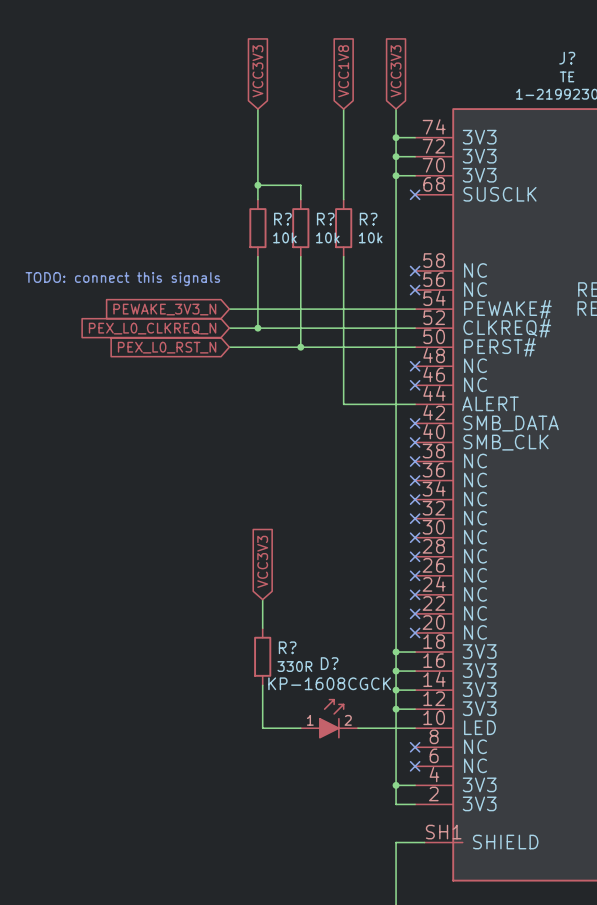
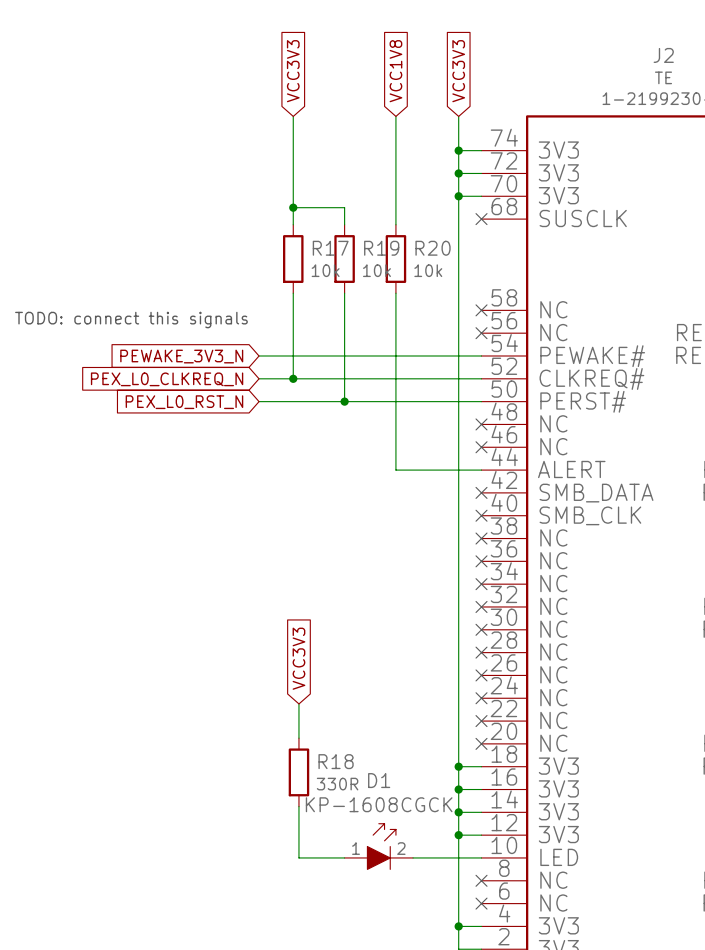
J? name: J? (567, 58) -> J2 (663, 55)
R? name: R? (282, 219) -> R17 (330, 248)
R? name: R? (325, 219) -> R19 (381, 248)
R? name: R? (368, 219) -> R20 (433, 248)
R? name: R? (287, 647) -> R18 (336, 761)
D? name: D? (329, 663) -> D1 (379, 780)

